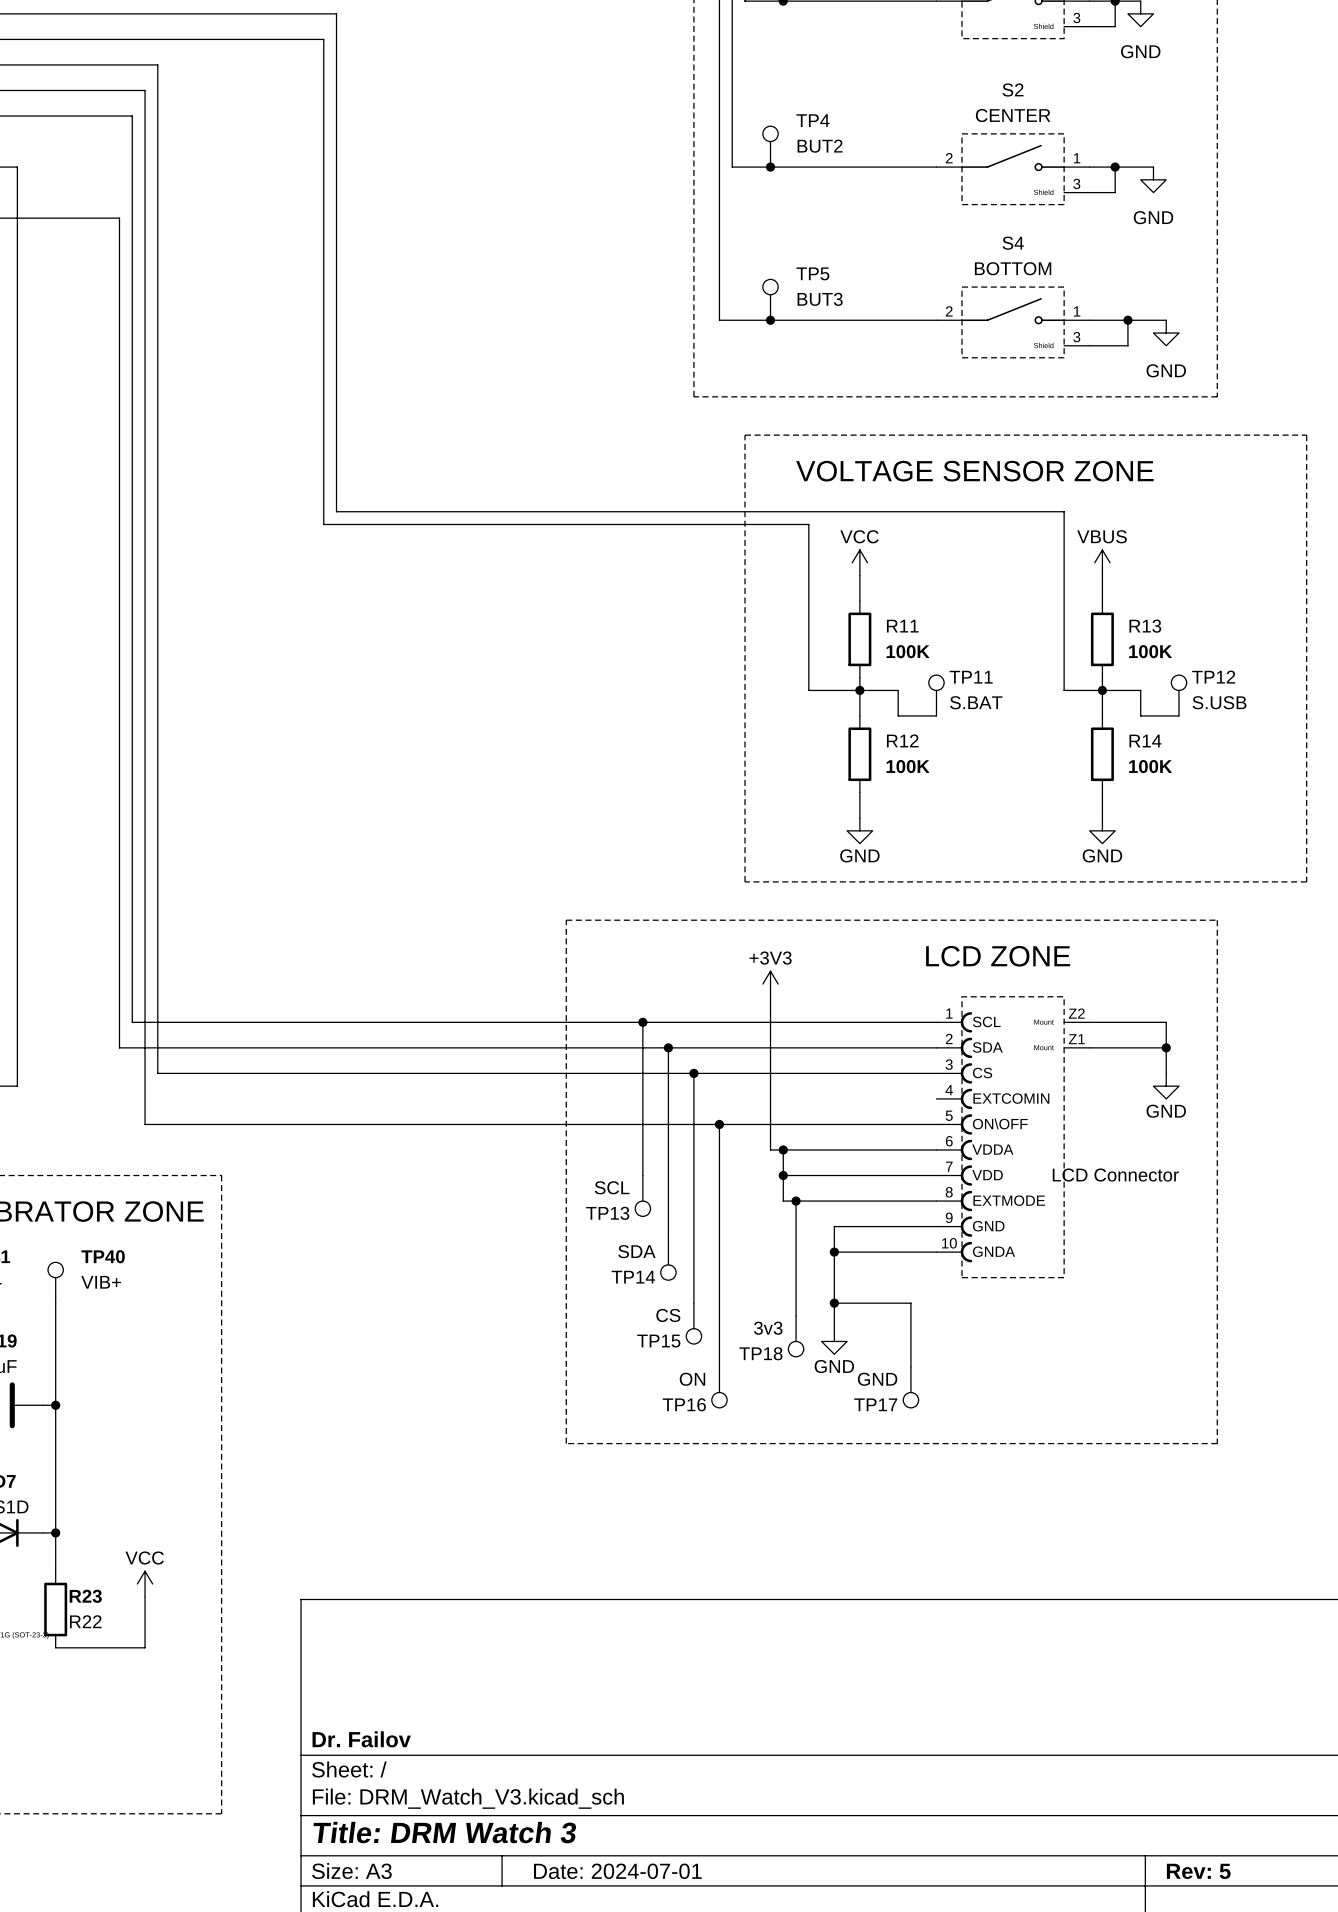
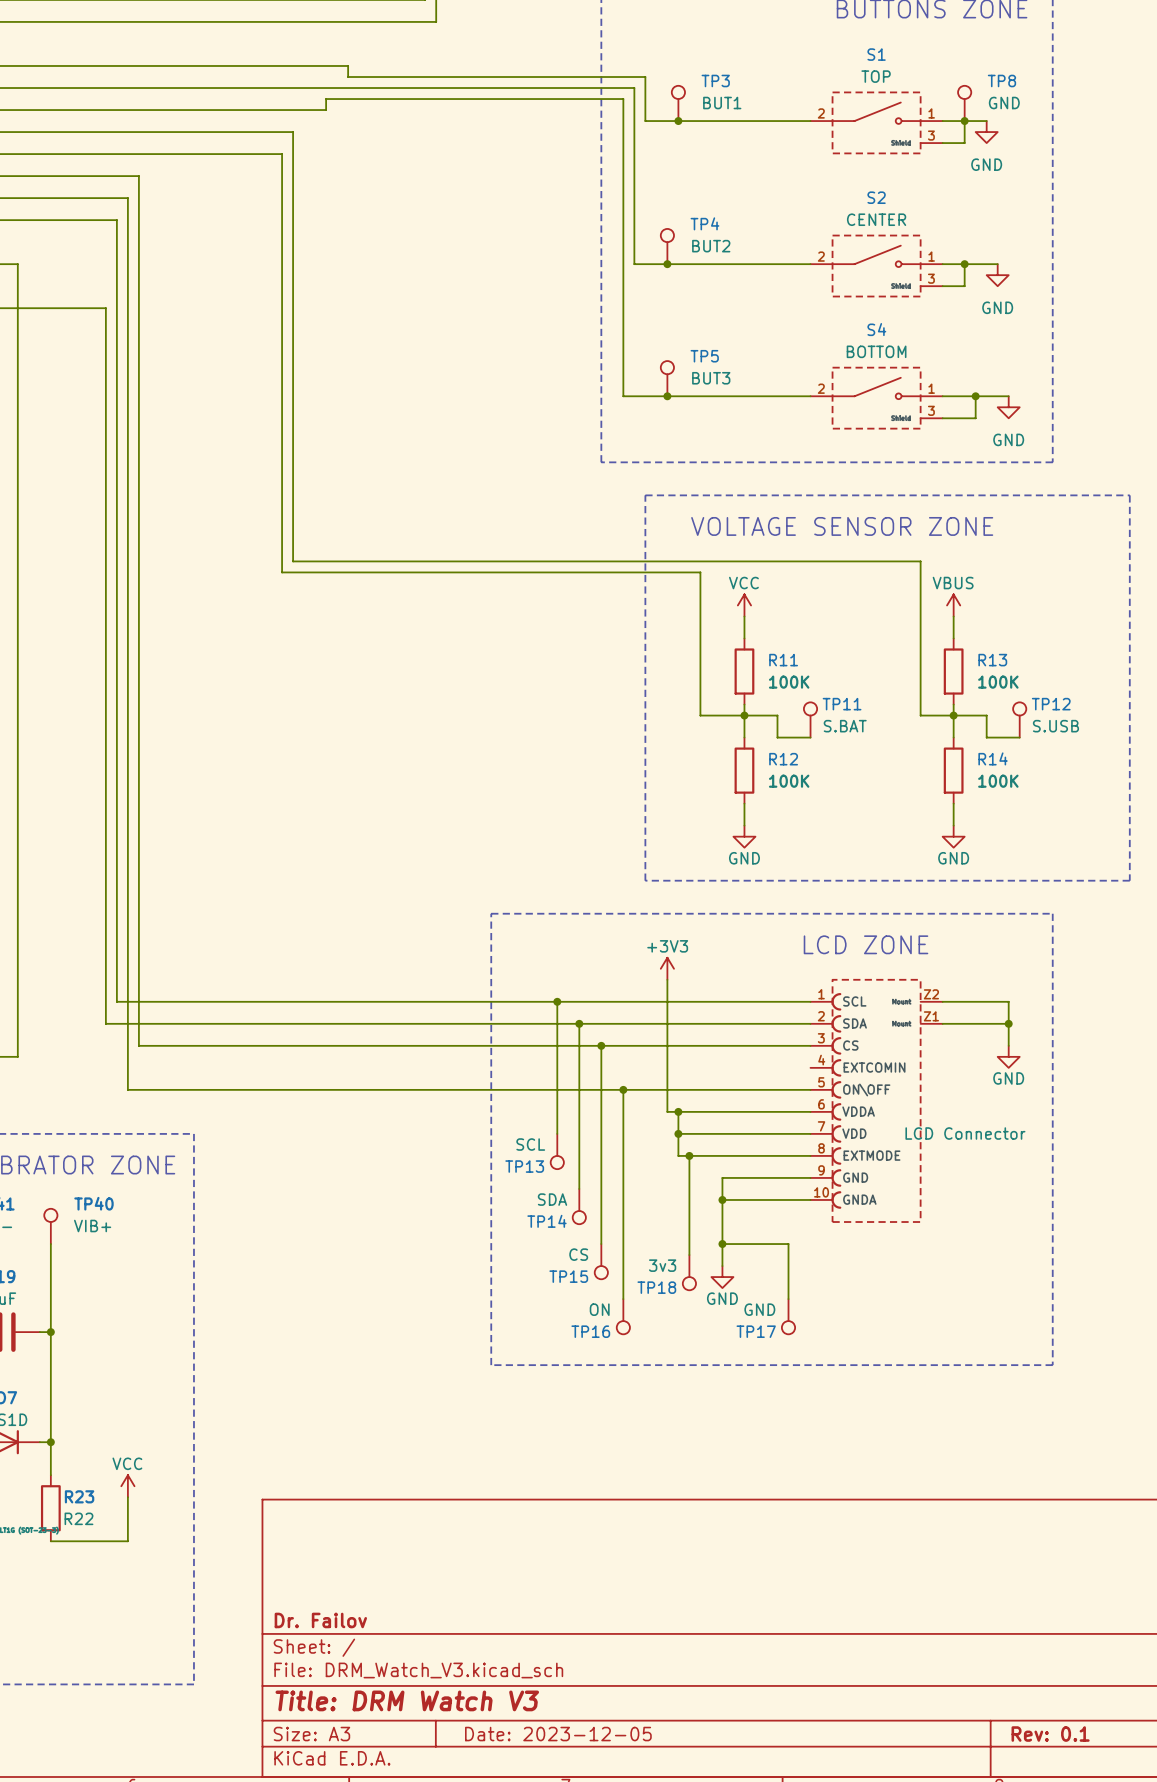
title block: Title: DRM Watch 3 (444, 1832) -> Title: DRM Watch V3 (407, 1700)
title block: Date: 2024-07-01 (617, 1871) -> Date: 2023-12-05 (558, 1734)
title block: Rev: 5 (1198, 1871) -> Rev: 0.1 (1050, 1734)

